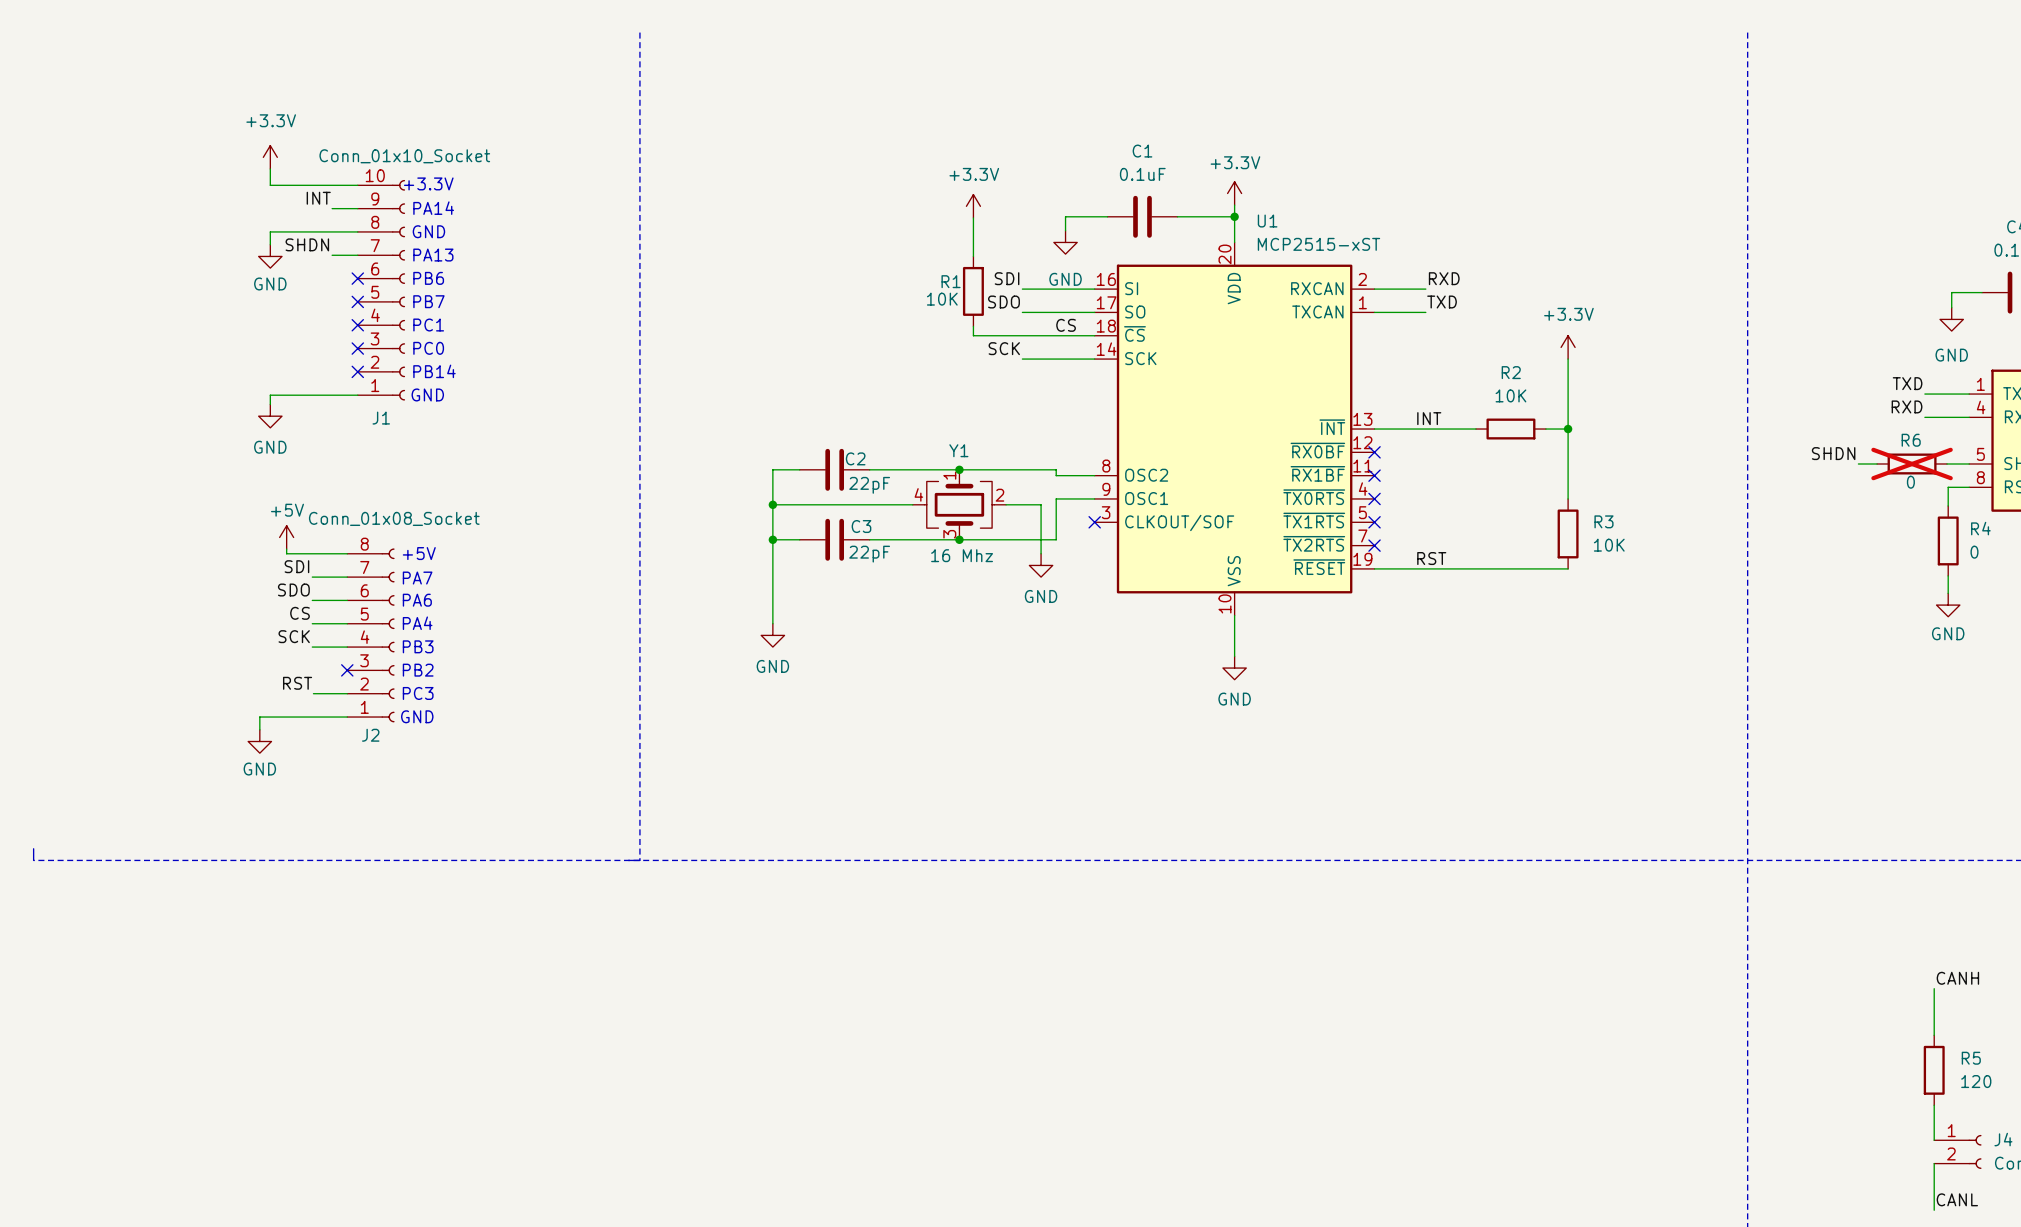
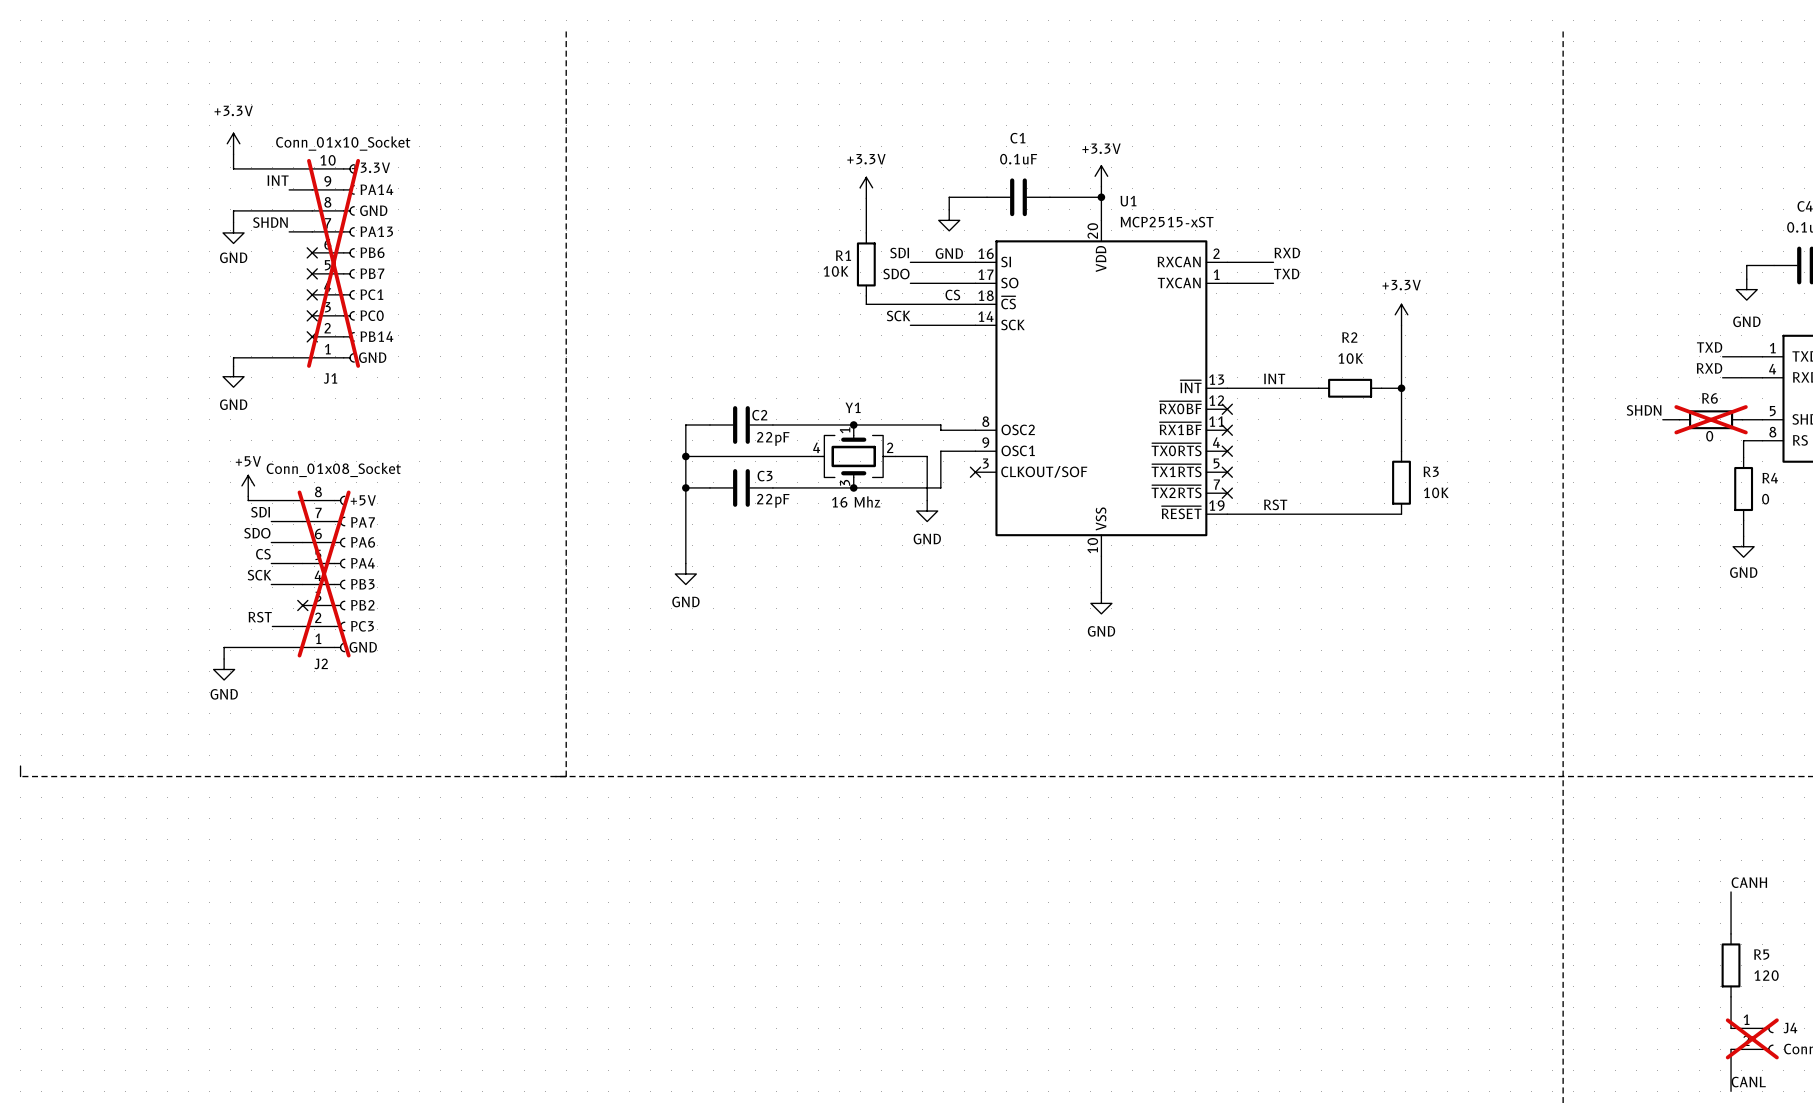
J1 do-not-place cross: none -> (333, 263)
J2 do-not-place cross: none -> (324, 574)
J4 do-not-place cross: none -> (1752, 1038)

